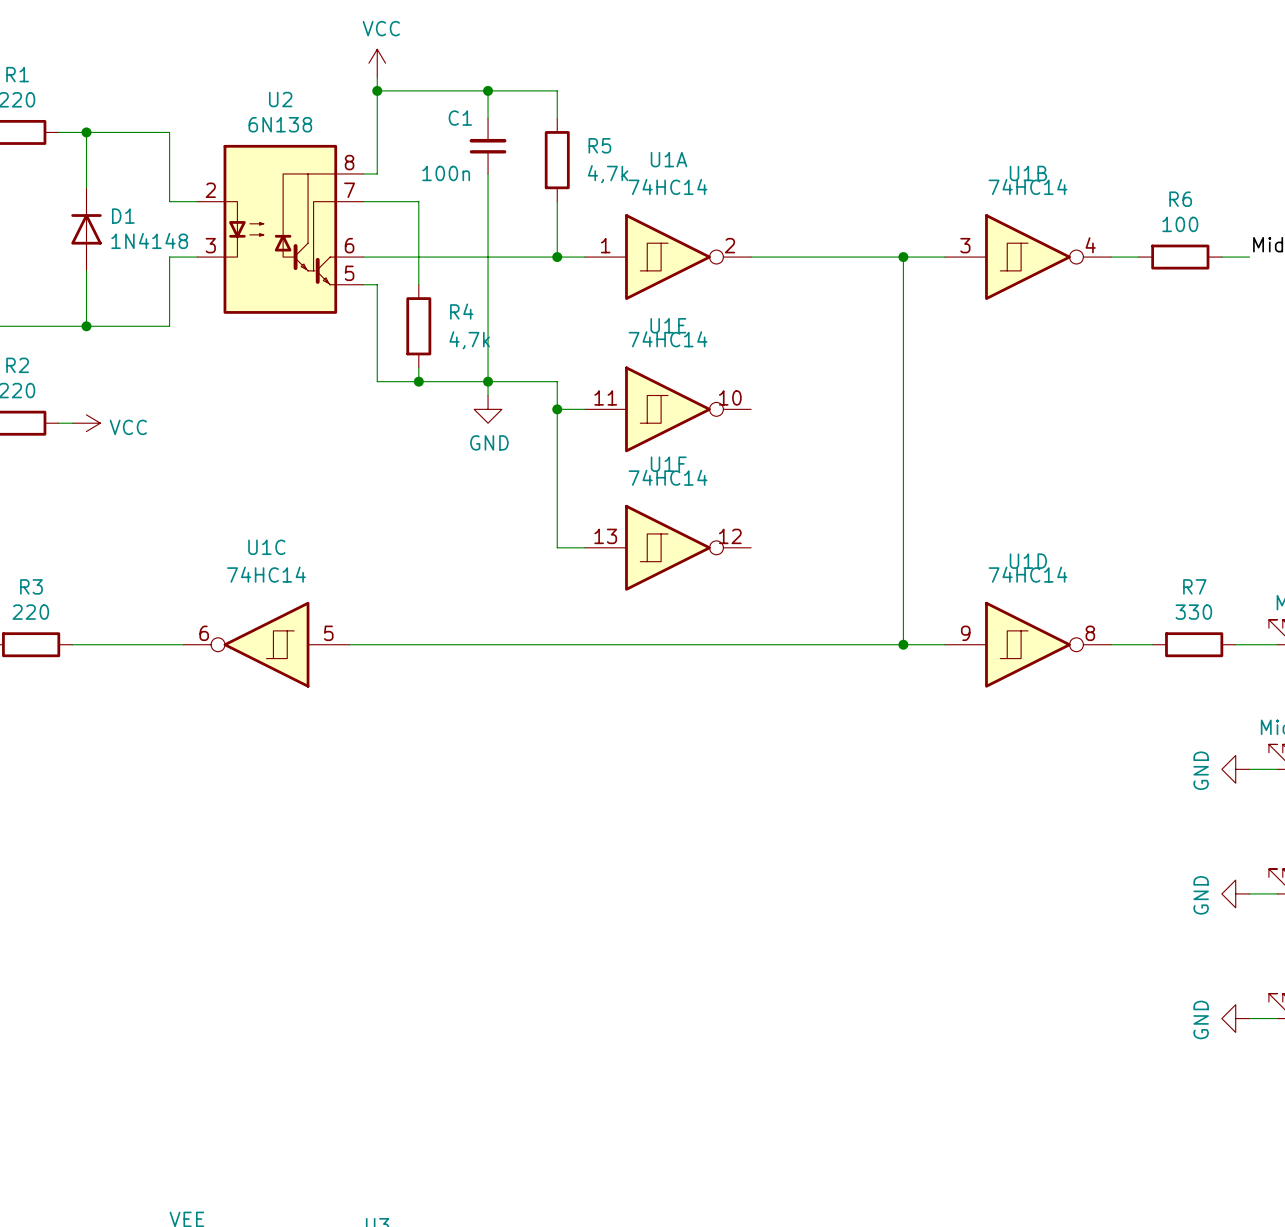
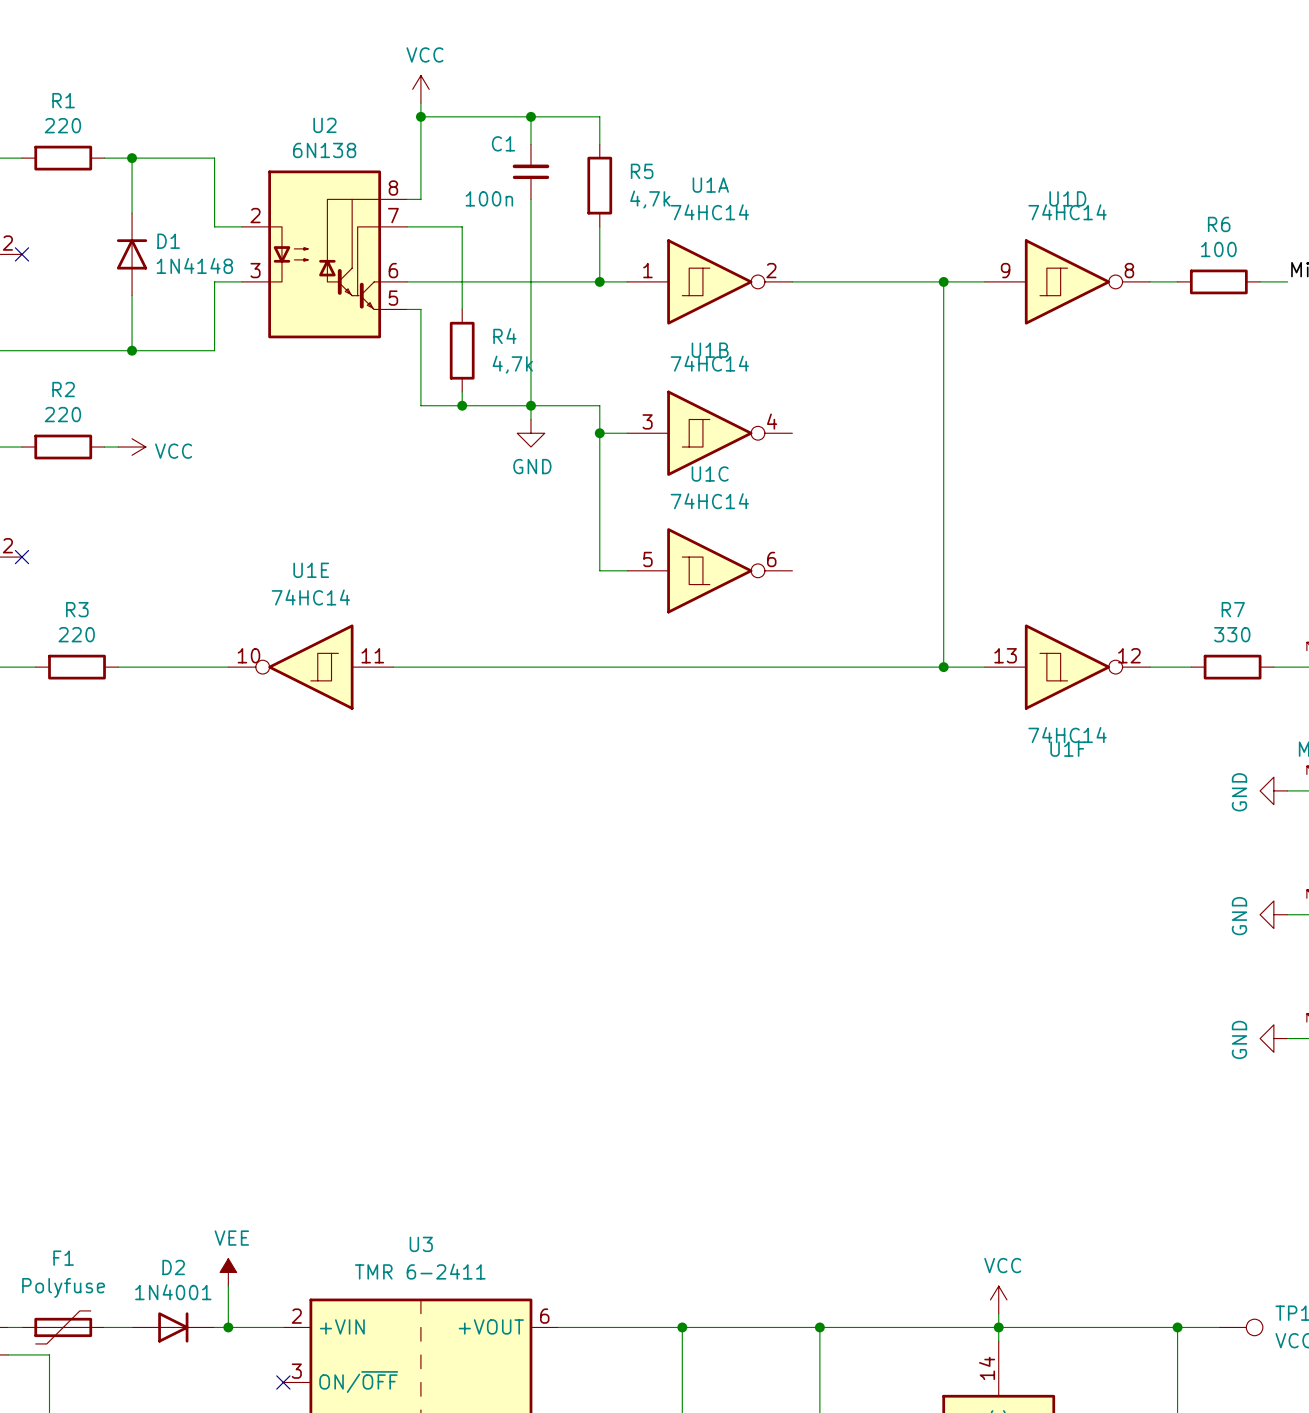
U1B position: (1028, 257) -> (709, 433)
U1E rotation: 0° (668, 409) -> 180° (310, 667)
U1E position: (668, 409) -> (310, 667)
U1F flip: as is (668, 547) -> up-down (1067, 667)
U1F position: (668, 547) -> (1067, 667)
U1C flip: as is (266, 644) -> left-right (709, 570)
U1C position: (266, 644) -> (709, 570)
U1D position: (1028, 644) -> (1067, 281)

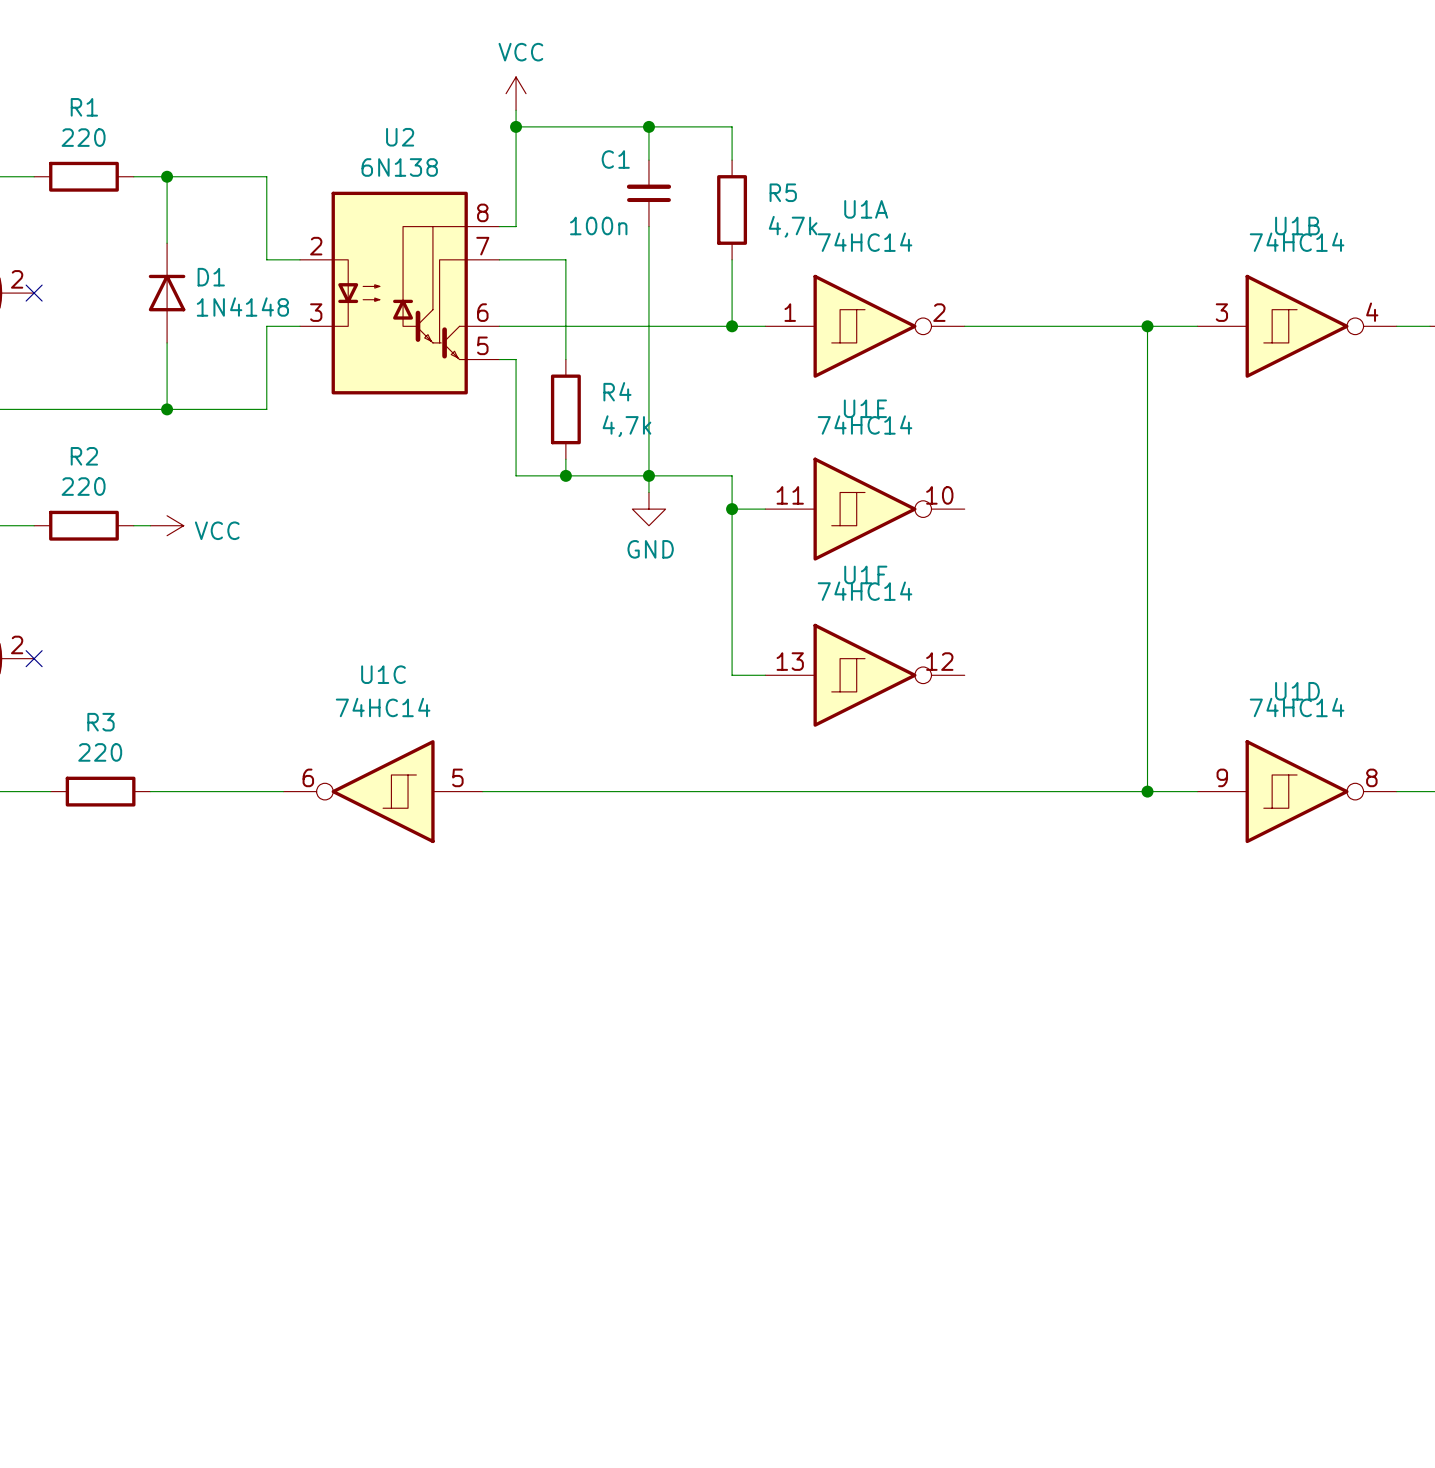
U1D position: (1067, 281) -> (1297, 791)
U1B position: (709, 433) -> (1297, 326)
U1C flip: as is (709, 570) -> left-right (383, 791)
U1C position: (709, 570) -> (383, 791)
U1E rotation: 0° (310, 667) -> 180° (865, 509)
U1E position: (310, 667) -> (865, 509)
U1F flip: as is (1067, 667) -> up-down (865, 675)
U1F position: (1067, 667) -> (865, 675)

